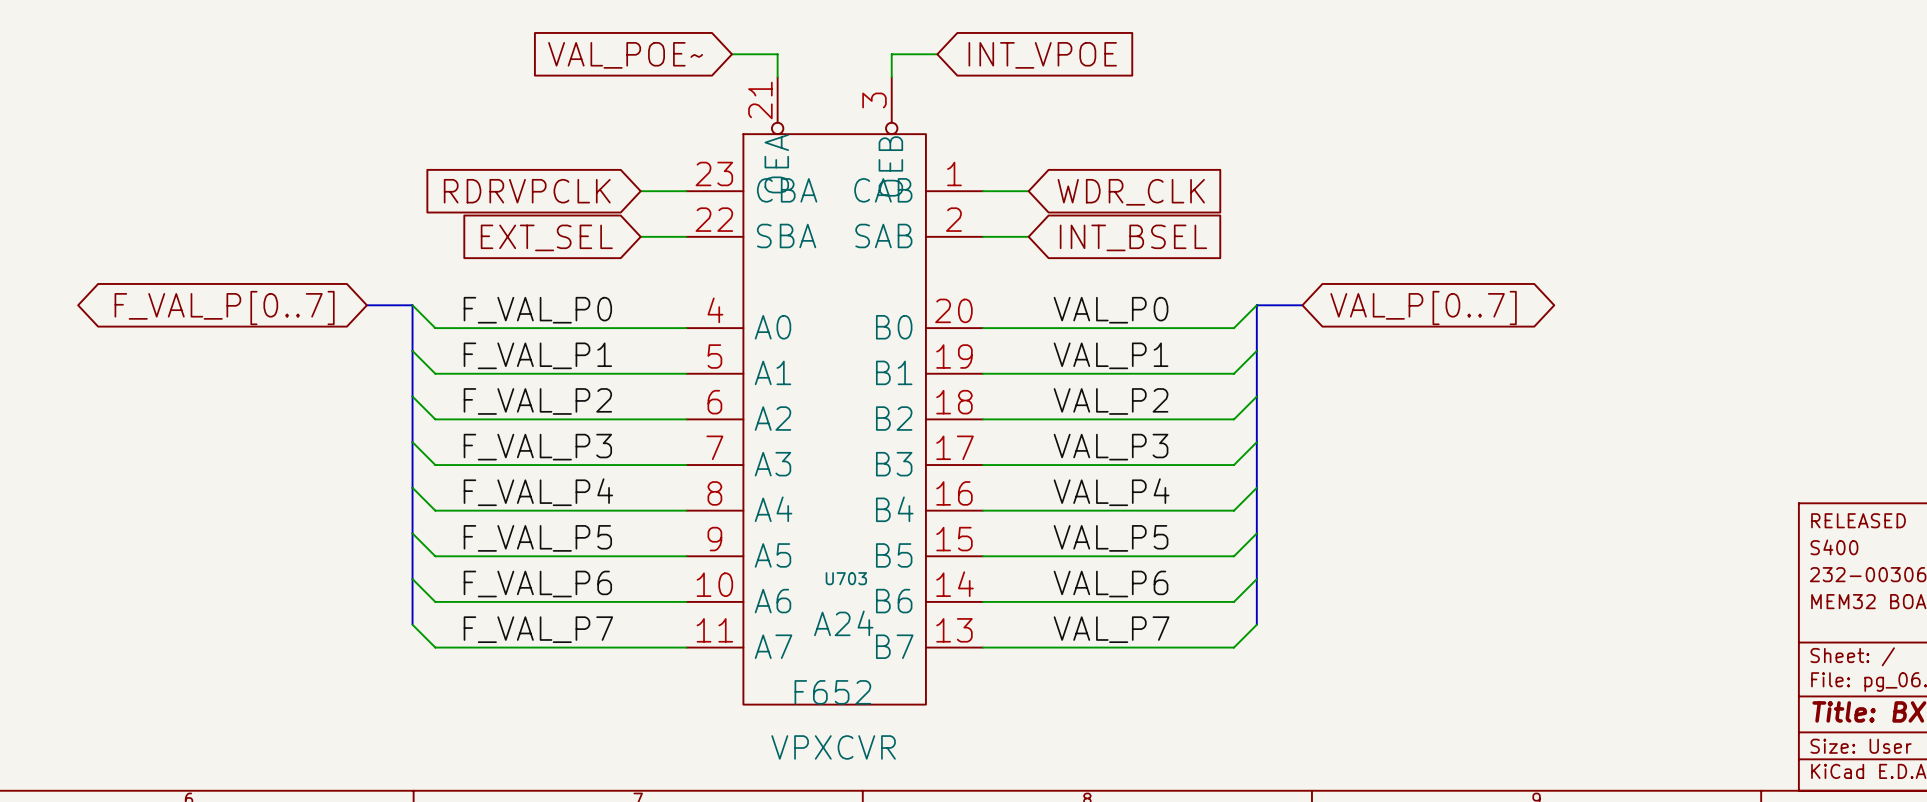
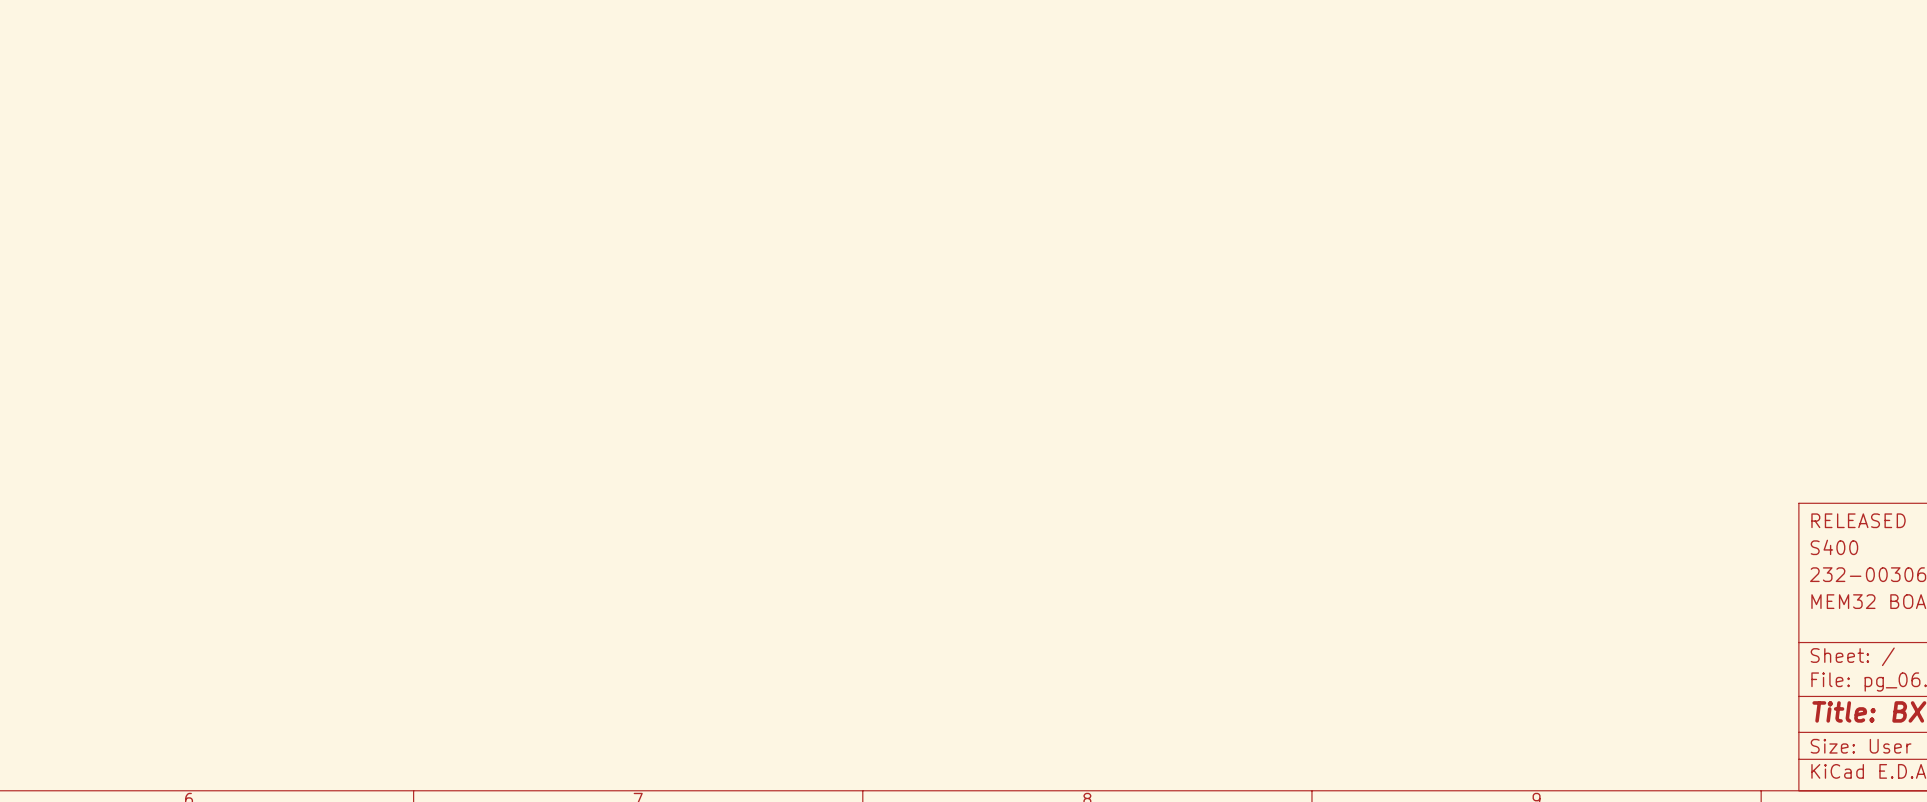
wire: (732, 54) (777, 54) (777, 77) -> none
wire: (937, 54) (891, 54) (891, 77) -> none
global label: VAL_POE~ (625, 55) -> none
global label: INT_VPOE (1042, 55) -> none
global label: RDRVPCLK (527, 191) -> none
wire: (640, 191) (686, 191) -> none
wire: (983, 191) (1028, 191) -> none
global label: WDR_CLK (1131, 192) -> none
wire: (640, 236) (686, 236) -> none
wire: (983, 236) (1028, 236) -> none
global label: EXT_SEL (546, 237) -> none
global label: INT_BSEL (1133, 237) -> none
bus: (366, 305) (412, 305) (412, 624) -> none
wire: (412, 305) (435, 328) (686, 328) -> none
wire: (1256, 305) (1234, 328) (983, 328) -> none
bus: (1302, 305) (1256, 305) (1256, 624) -> none
global label: F_VAL_P[0..7] (224, 308) -> none
global label: VAL_P[0..7] (1423, 308) -> none
label: F_VAL_P0 (537, 310) -> none
label: VAL_P0 (1111, 310) -> none
wire: (412, 350) (435, 373) (686, 373) -> none
wire: (1256, 350) (1234, 373) (983, 373) -> none
label: F_VAL_P1 (537, 355) -> none
label: VAL_P1 (1111, 355) -> none
U703: F652 (834, 390) -> none
wire: (412, 396) (435, 419) (686, 419) -> none
wire: (1256, 396) (1234, 419) (983, 419) -> none
label: F_VAL_P2 (537, 401) -> none
label: VAL_P2 (1111, 401) -> none
wire: (412, 442) (435, 465) (686, 465) -> none
wire: (1256, 442) (1234, 465) (983, 465) -> none
label: F_VAL_P3 (537, 447) -> none
label: VAL_P3 (1111, 447) -> none
wire: (412, 487) (435, 510) (686, 510) -> none
wire: (1256, 487) (1234, 510) (983, 510) -> none
label: F_VAL_P4 (538, 492) -> none
label: VAL_P4 (1111, 492) -> none
wire: (412, 533) (435, 556) (686, 556) -> none
wire: (1256, 533) (1234, 556) (983, 556) -> none
label: F_VAL_P5 (537, 538) -> none
label: VAL_P5 (1111, 538) -> none
wire: (412, 579) (435, 601) (686, 601) -> none
wire: (1256, 579) (1234, 601) (983, 601) -> none
label: F_VAL_P6 (537, 584) -> none
label: VAL_P6 (1111, 584) -> none
wire: (412, 624) (435, 647) (686, 647) -> none
wire: (1256, 624) (1234, 647) (983, 647) -> none
label: F_VAL_P7 (538, 629) -> none
label: VAL_P7 (1111, 629) -> none

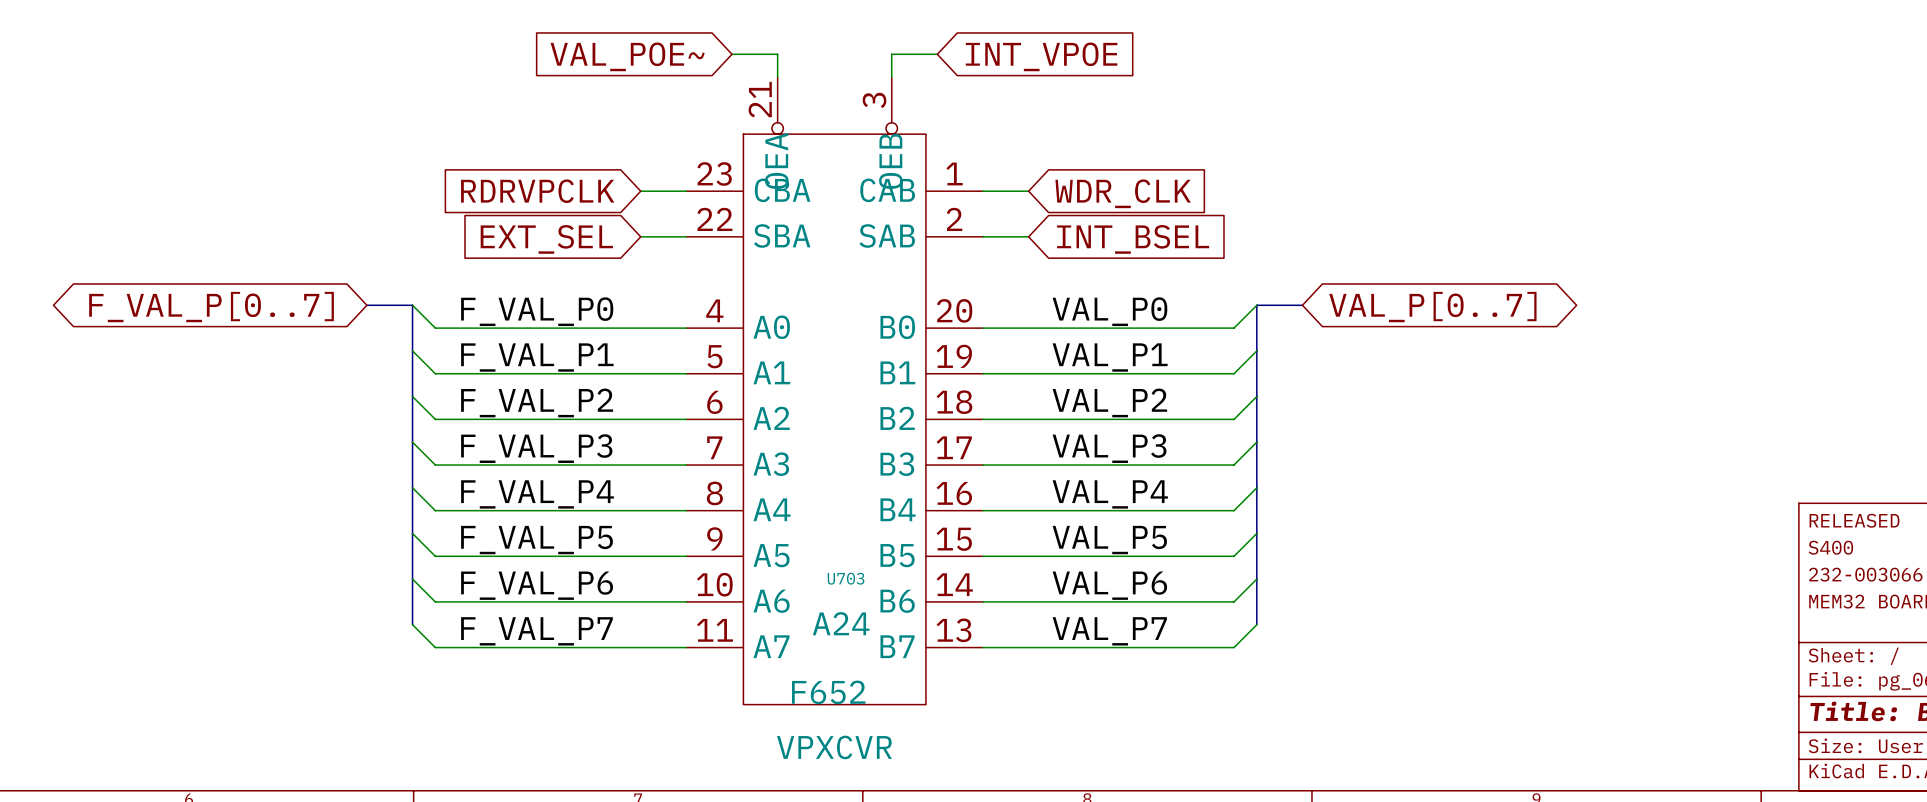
wire: none -> (732, 54) (777, 54) (777, 77)
wire: none -> (937, 54) (891, 54) (891, 77)
global label: none -> VAL_POE~ (627, 56)
global label: none -> INT_VPOE (1041, 56)
global label: none -> RDRVPCLK (537, 191)
wire: none -> (640, 191) (686, 191)
wire: none -> (983, 191) (1028, 191)
global label: none -> WDR_CLK (1123, 193)
wire: none -> (640, 236) (686, 236)
wire: none -> (983, 236) (1028, 236)
global label: none -> EXT_SEL (546, 239)
global label: none -> INT_BSEL (1133, 239)
bus: none -> (366, 305) (412, 305) (412, 624)
wire: none -> (412, 305) (435, 328) (686, 328)
wire: none -> (1256, 305) (1234, 328) (983, 328)
bus: none -> (1302, 305) (1256, 305) (1256, 624)
global label: none -> F_VAL_P[0..7] (211, 307)
global label: none -> VAL_P[0..7] (1432, 307)
label: none -> F_VAL_P0 (537, 311)
label: none -> VAL_P0 (1109, 311)
wire: none -> (412, 350) (435, 373) (686, 373)
wire: none -> (1256, 350) (1234, 373) (983, 373)
label: none -> F_VAL_P1 (537, 357)
label: none -> VAL_P1 (1110, 357)
U703: none -> F652 (834, 390)
wire: none -> (412, 396) (435, 419) (686, 419)
wire: none -> (1256, 396) (1234, 419) (983, 419)
label: none -> F_VAL_P2 (537, 402)
label: none -> VAL_P2 (1109, 402)
wire: none -> (412, 442) (435, 465) (686, 465)
wire: none -> (1256, 442) (1234, 465) (983, 465)
label: none -> F_VAL_P3 (536, 448)
label: none -> VAL_P3 (1109, 448)
wire: none -> (412, 487) (435, 510) (686, 510)
wire: none -> (1256, 487) (1234, 510) (983, 510)
label: none -> F_VAL_P4 (537, 494)
label: none -> VAL_P4 (1110, 494)
wire: none -> (412, 533) (435, 556) (686, 556)
wire: none -> (1256, 533) (1234, 556) (983, 556)
label: none -> F_VAL_P5 (537, 540)
label: none -> VAL_P5 (1109, 540)
wire: none -> (412, 579) (435, 601) (686, 601)
wire: none -> (1256, 579) (1234, 601) (983, 601)
label: none -> F_VAL_P6 (537, 585)
label: none -> VAL_P6 (1109, 585)
wire: none -> (412, 624) (435, 647) (686, 647)
wire: none -> (1256, 624) (1234, 647) (983, 647)
label: none -> F_VAL_P7 (536, 631)
label: none -> VAL_P7 (1109, 631)

